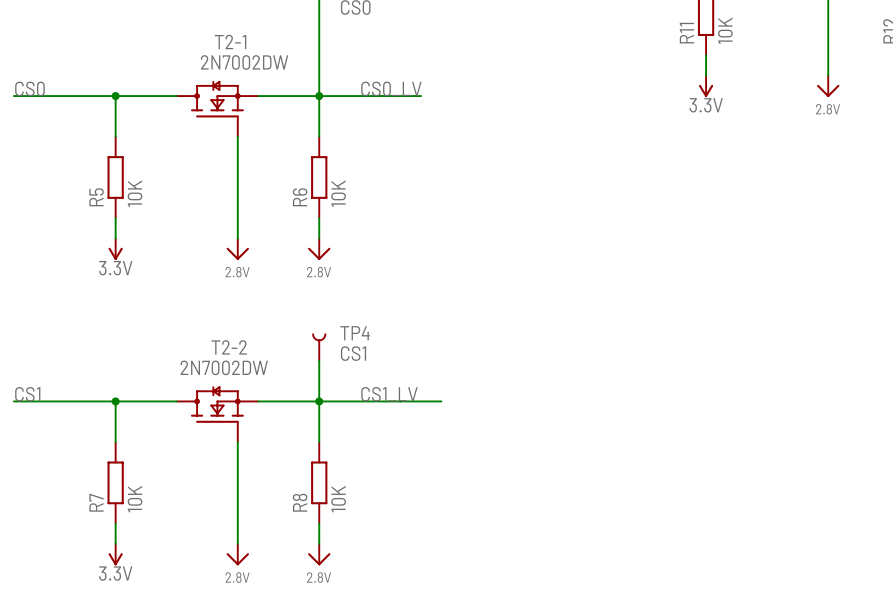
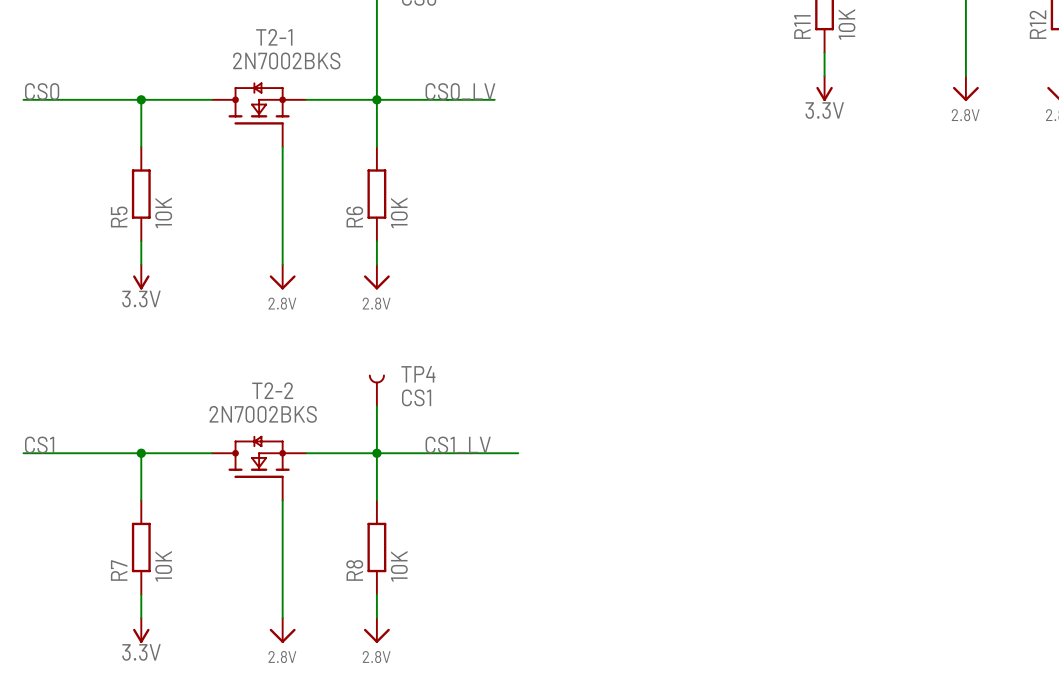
T2-1 value: 2N7002DW (244, 62) -> 2N7002BKS (286, 60)
T2-2 value: 2N7002DW (224, 367) -> 2N7002BKS (263, 414)

